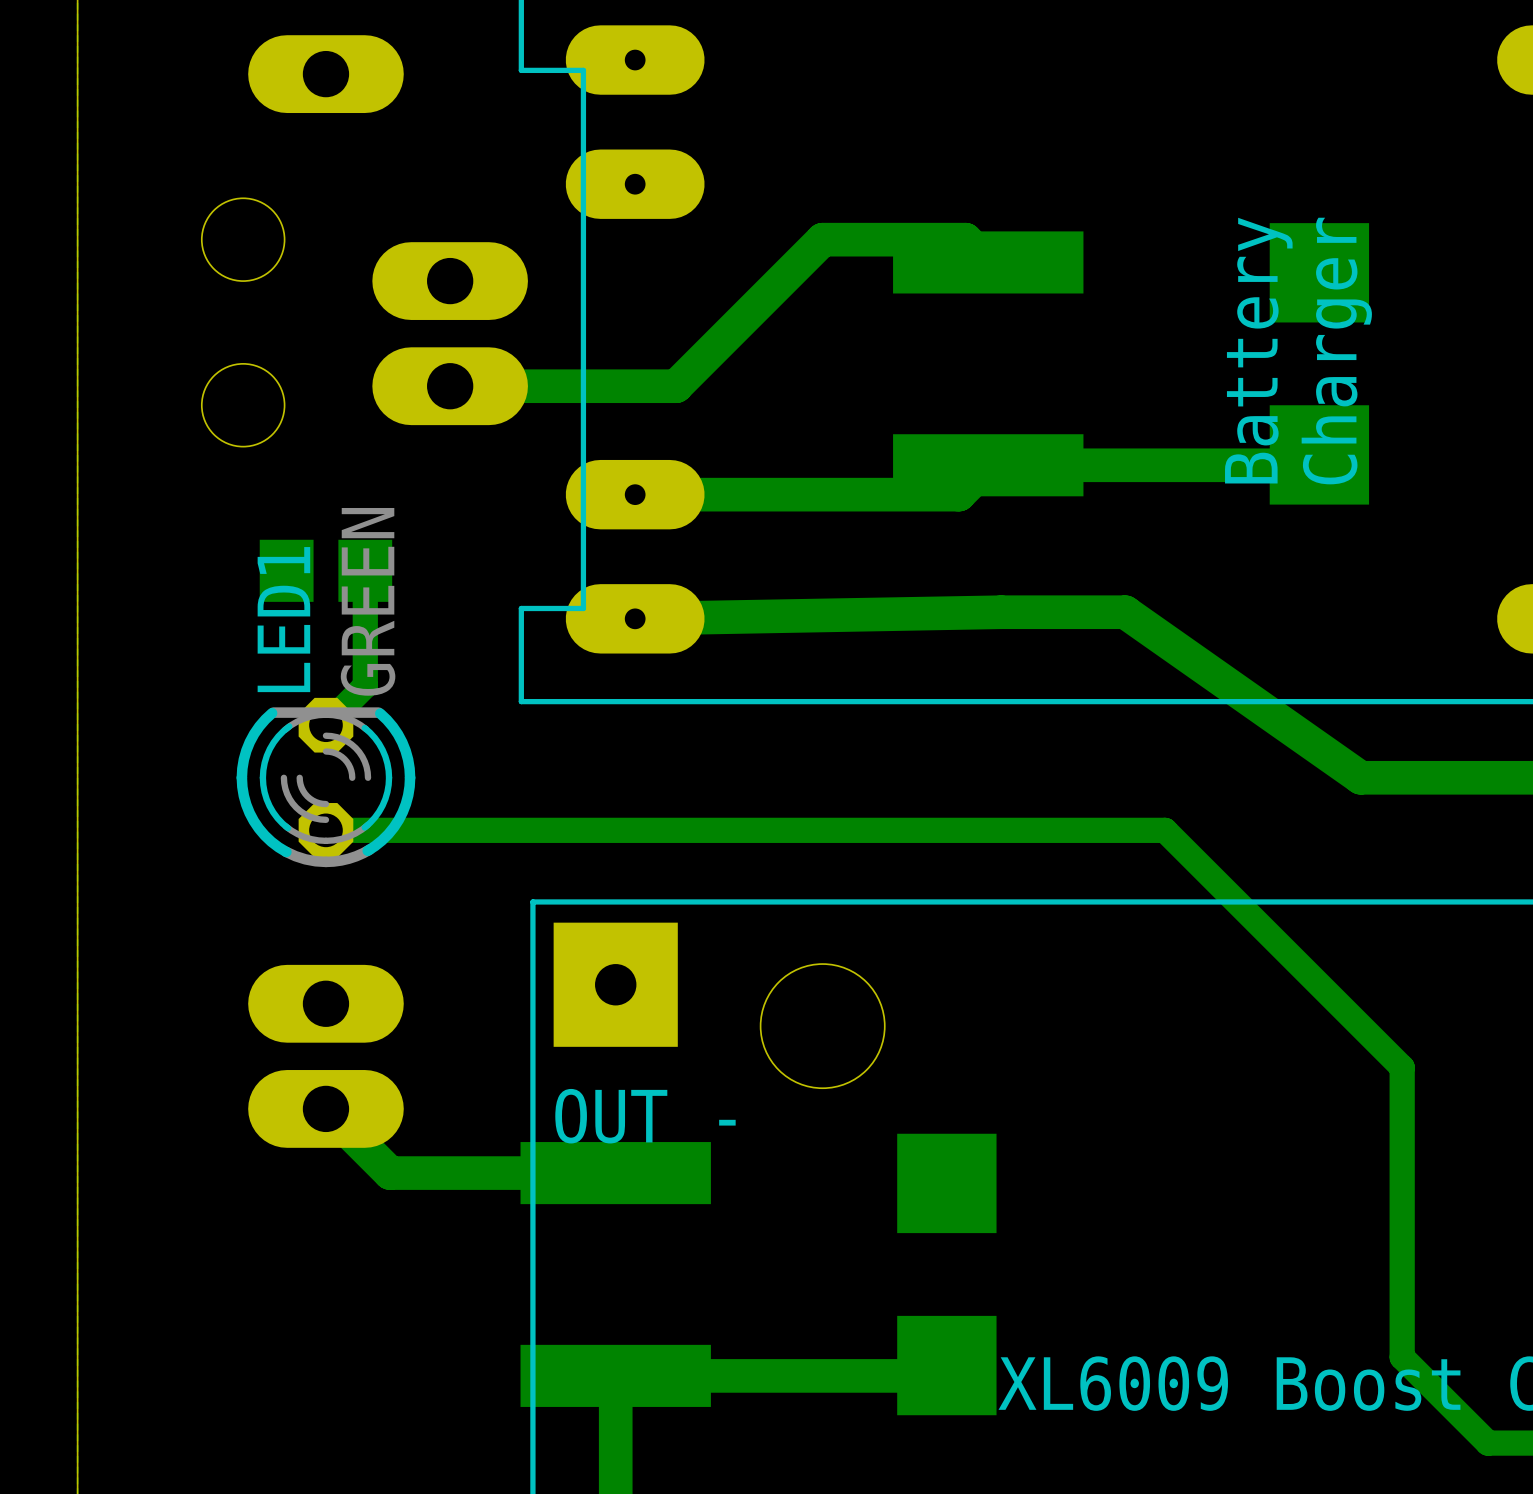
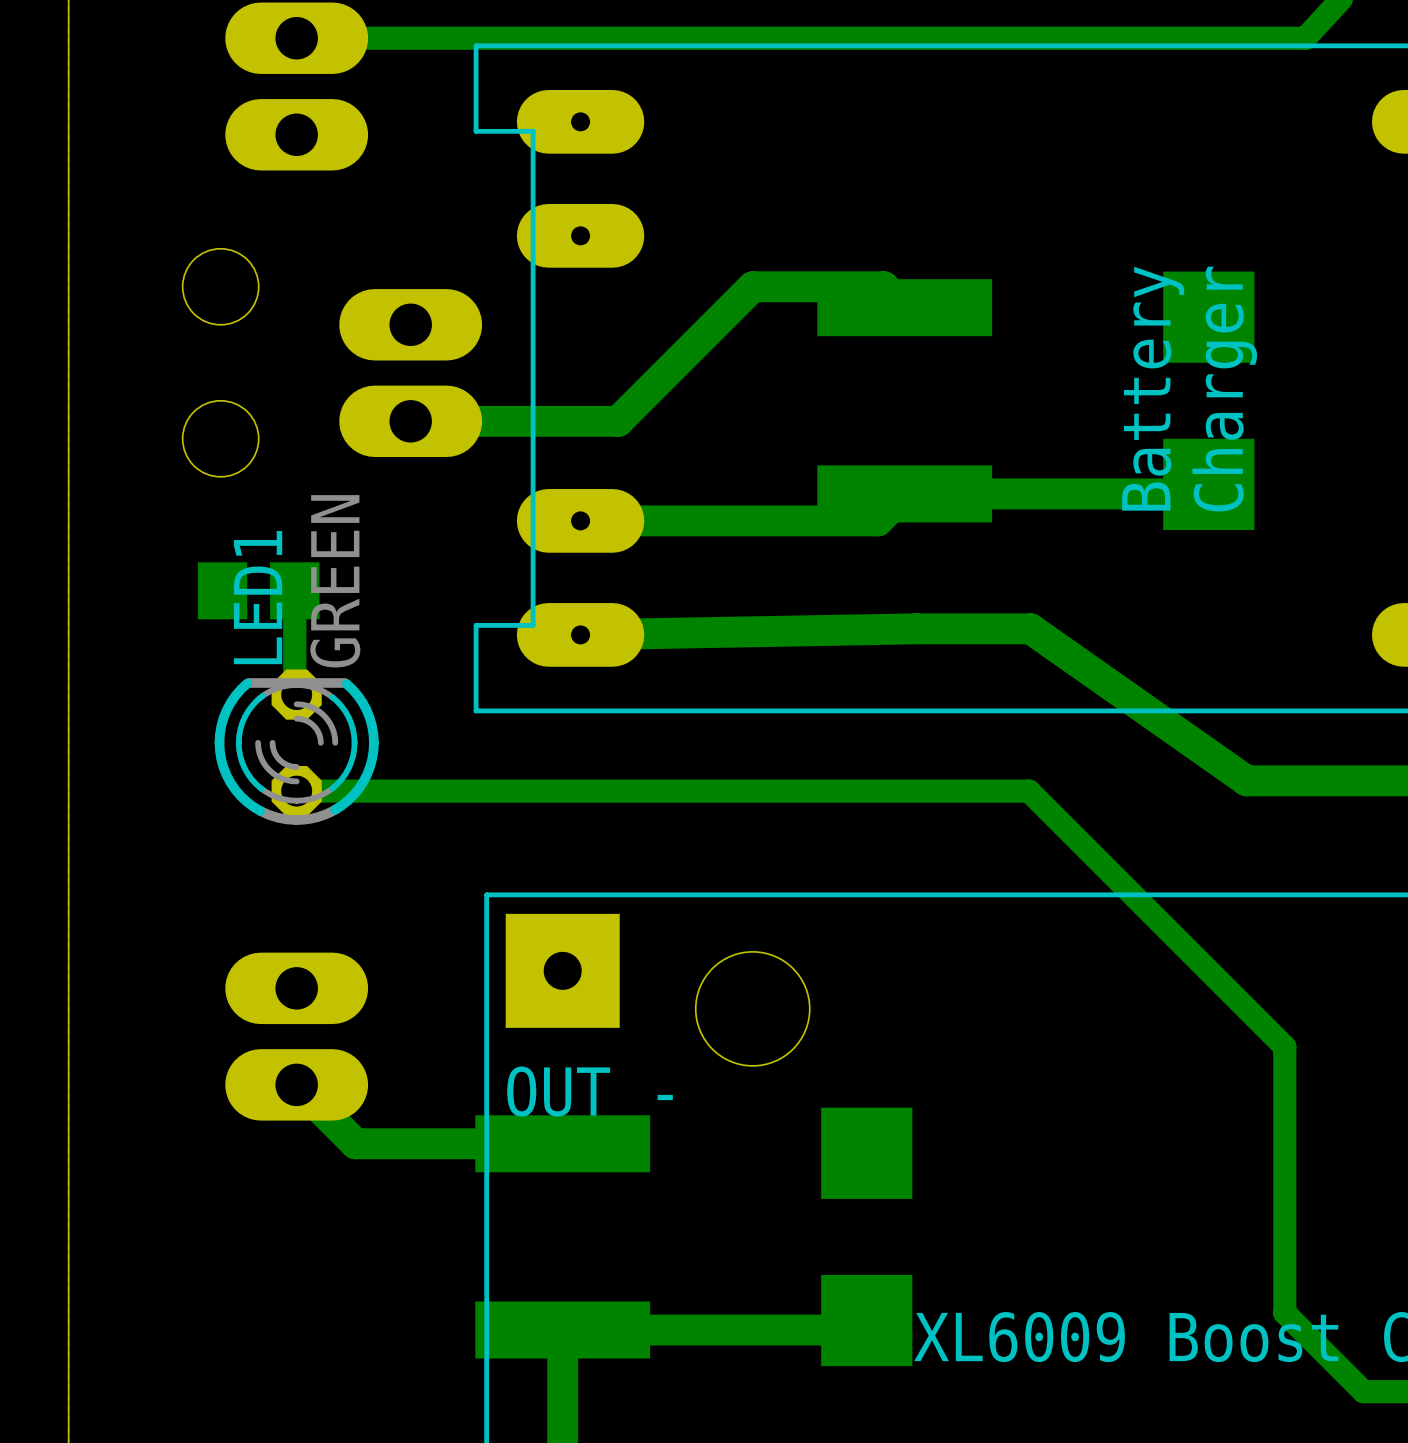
bottom track: none -> (294, 590) (294, 696) (296, 694)
part position: (325, 570) -> (258, 590)
bottom track: (365, 570) (365, 685) (325, 725) -> none
LED1 position: (325, 782) -> (296, 747)
bottom track: (325, 830) (1165, 830) -> (296, 791) (1029, 791) (1067, 829)

